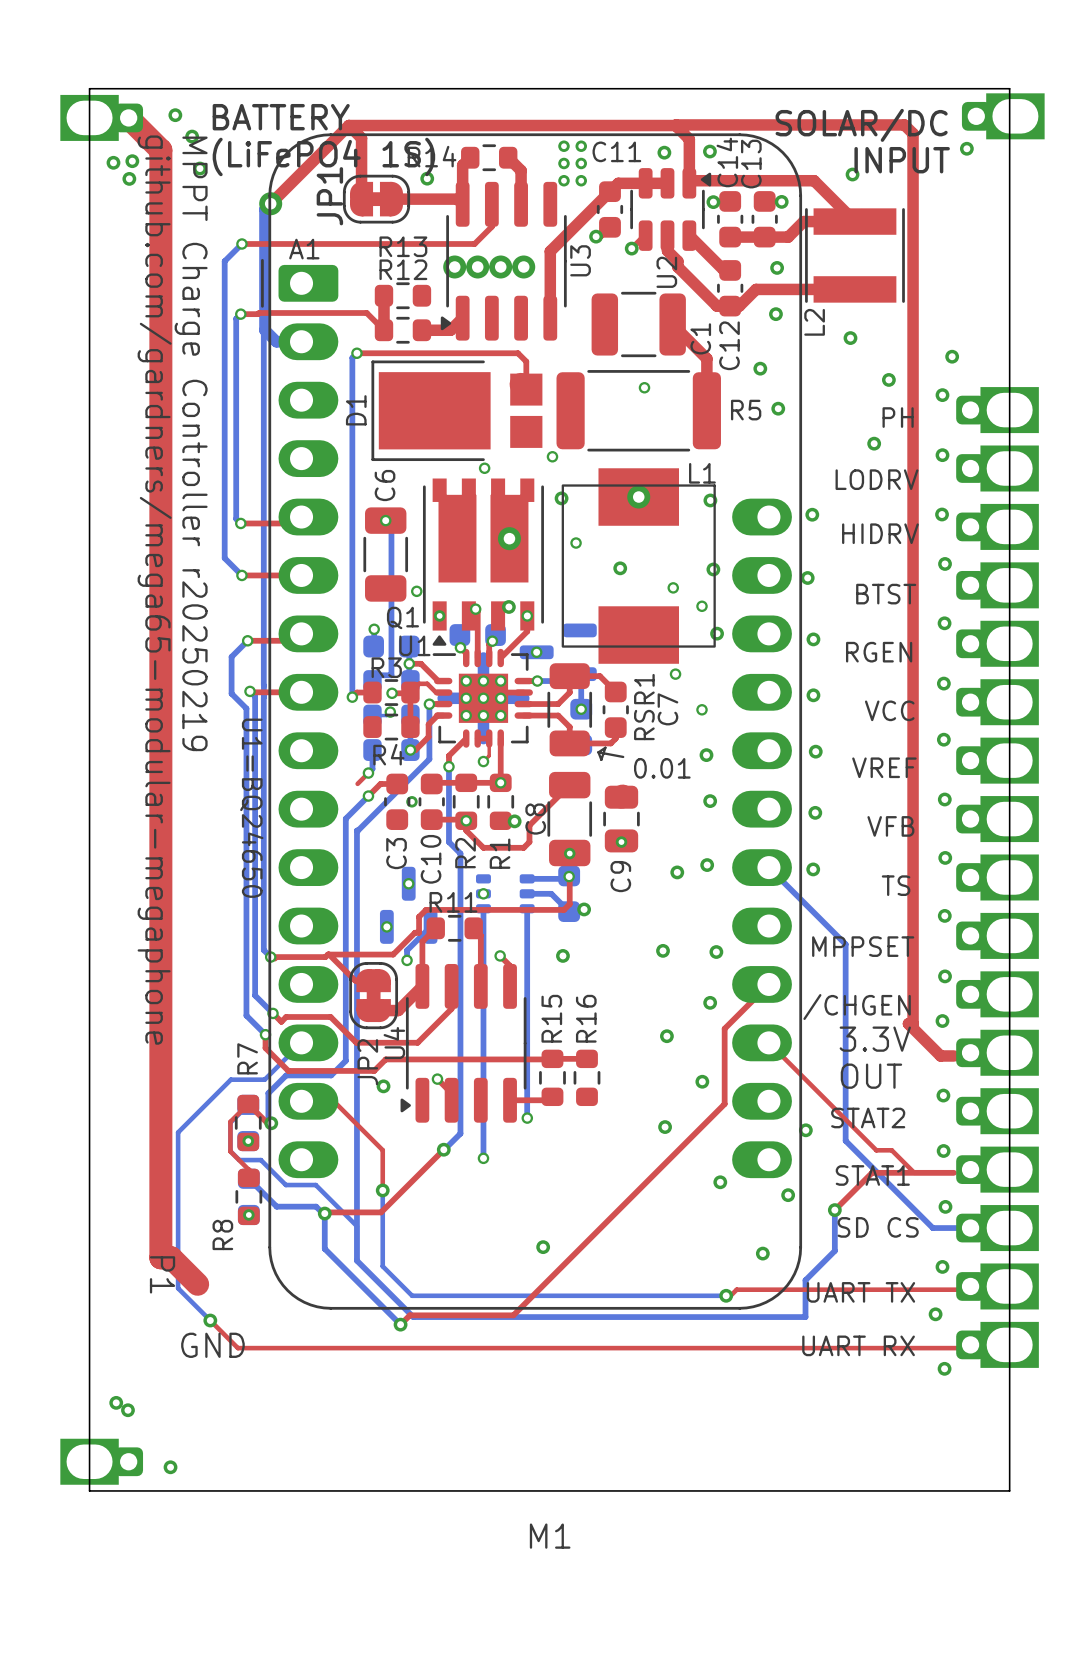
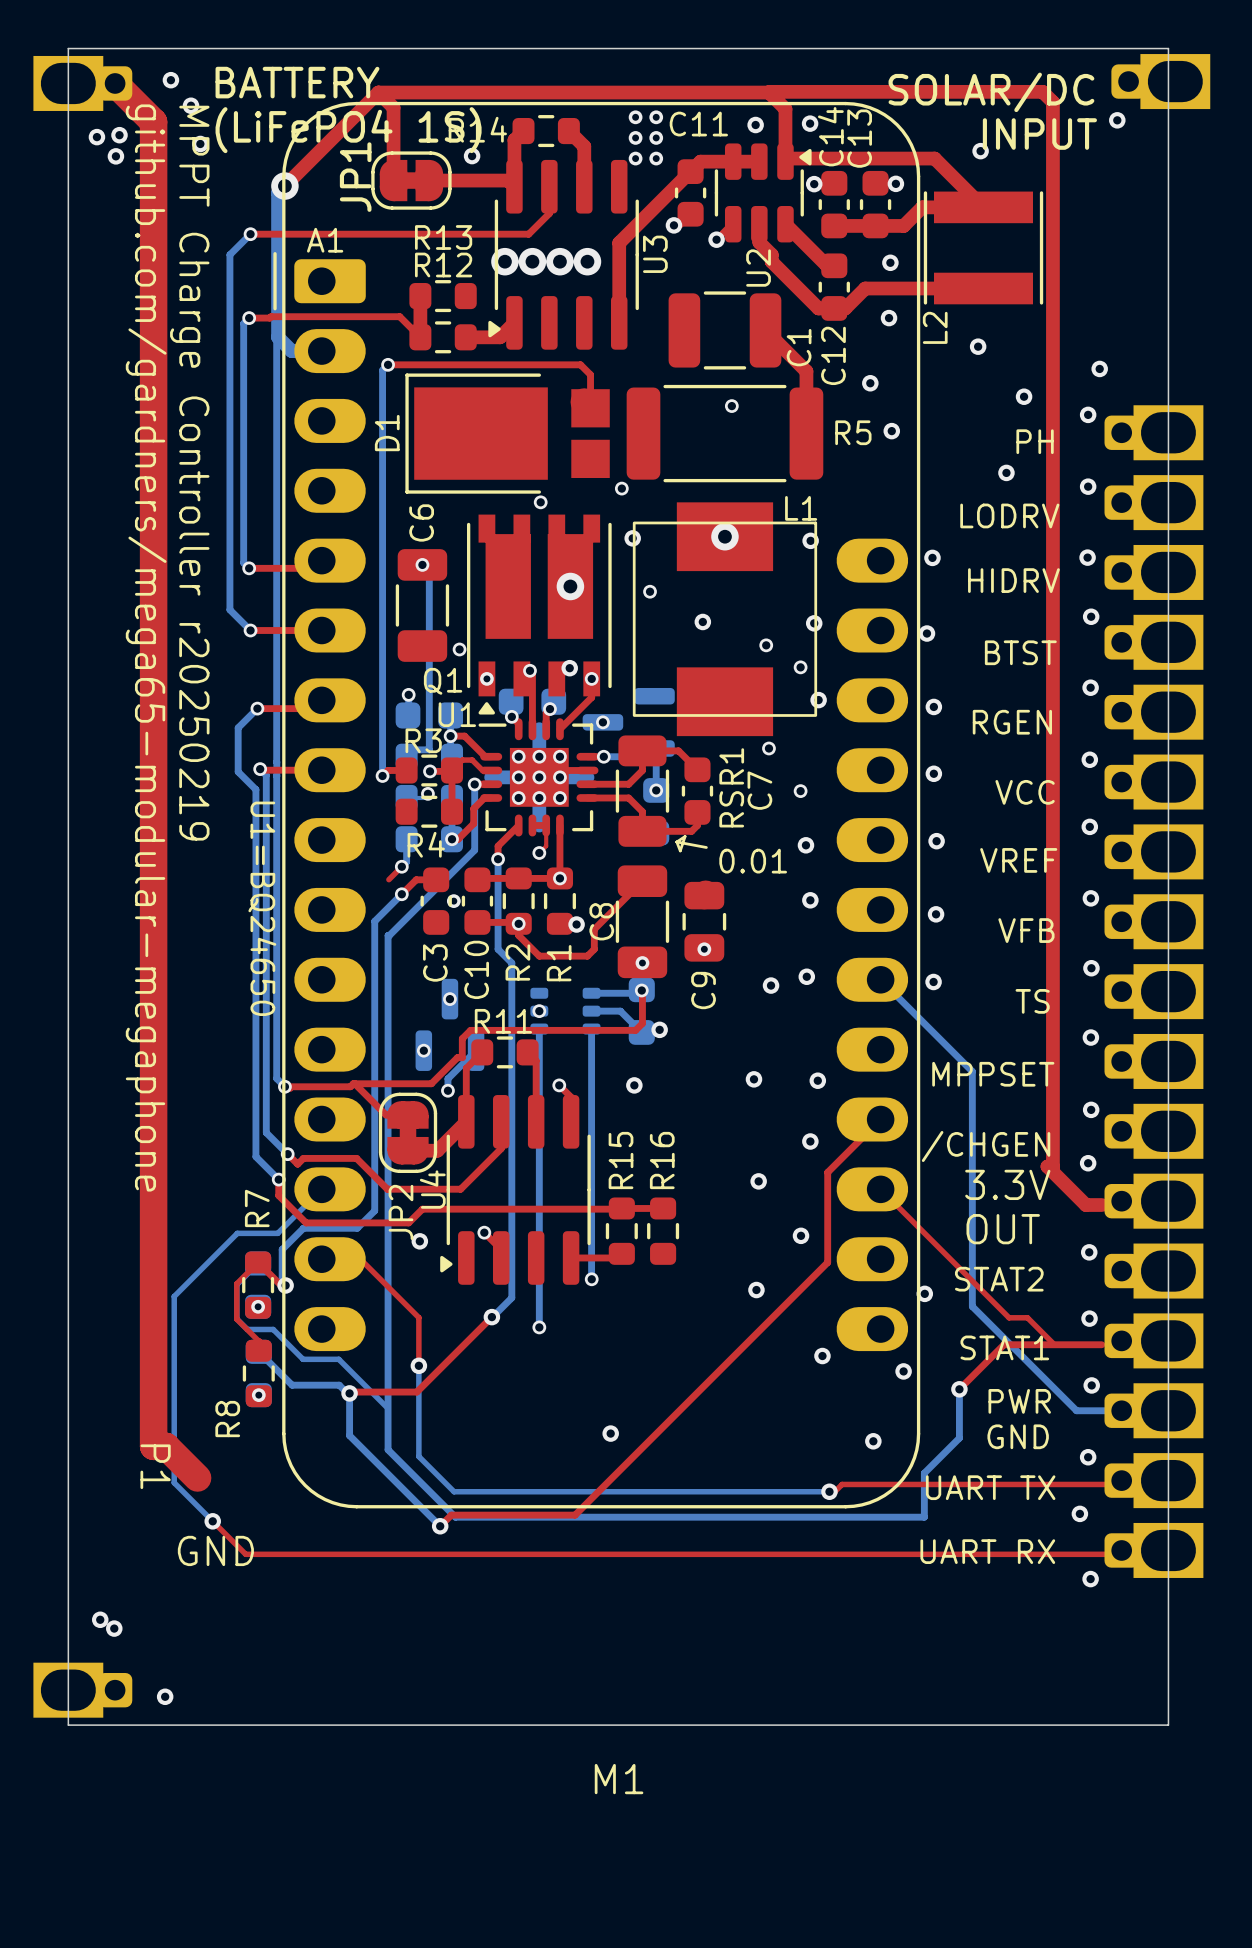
text: none -> PWR (1019, 1401)
text: SD CS (878, 1227) -> none
text: none -> GND (1018, 1436)

